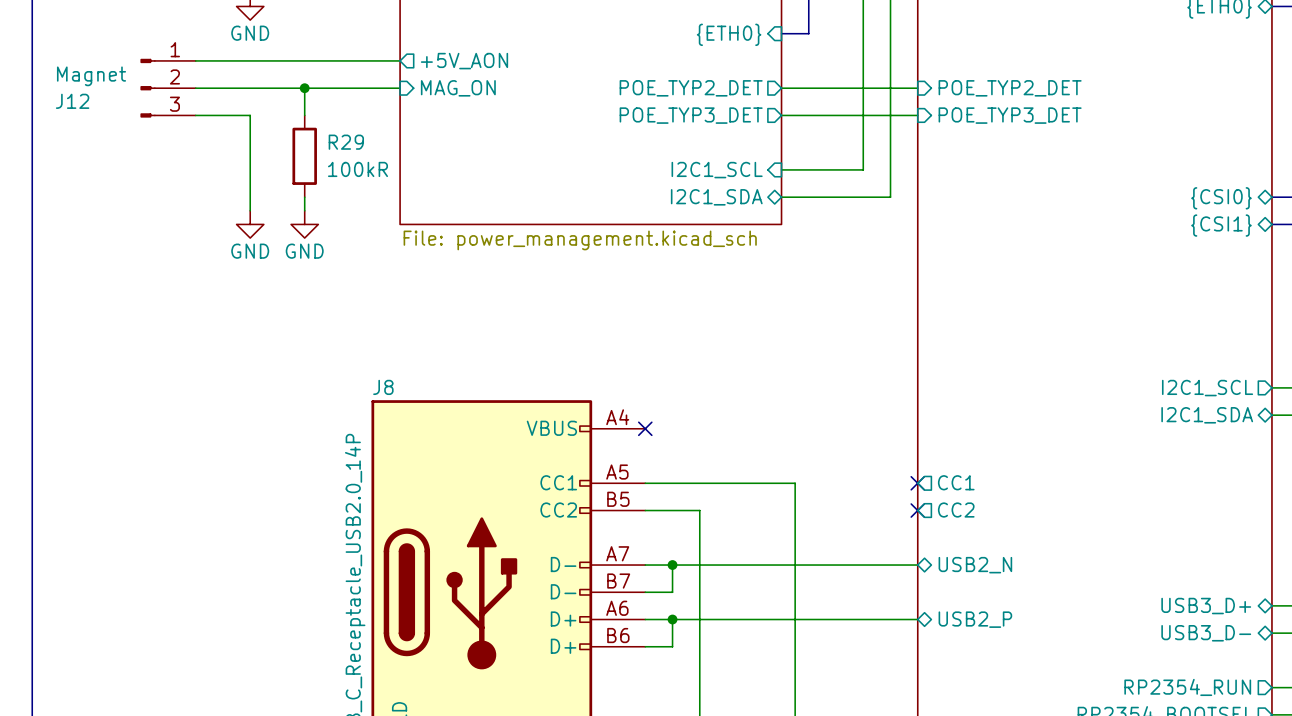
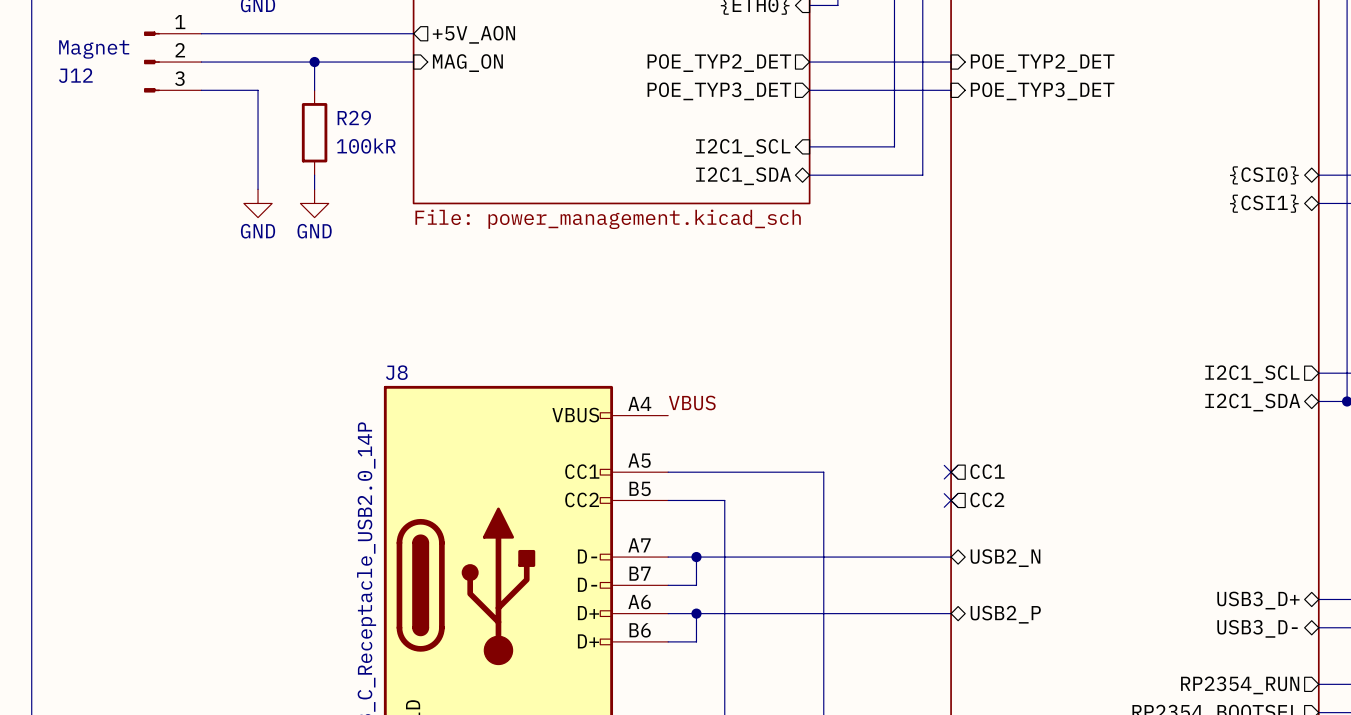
label: none -> VBUS (692, 402)
no-connect mark: (645, 428) -> none

